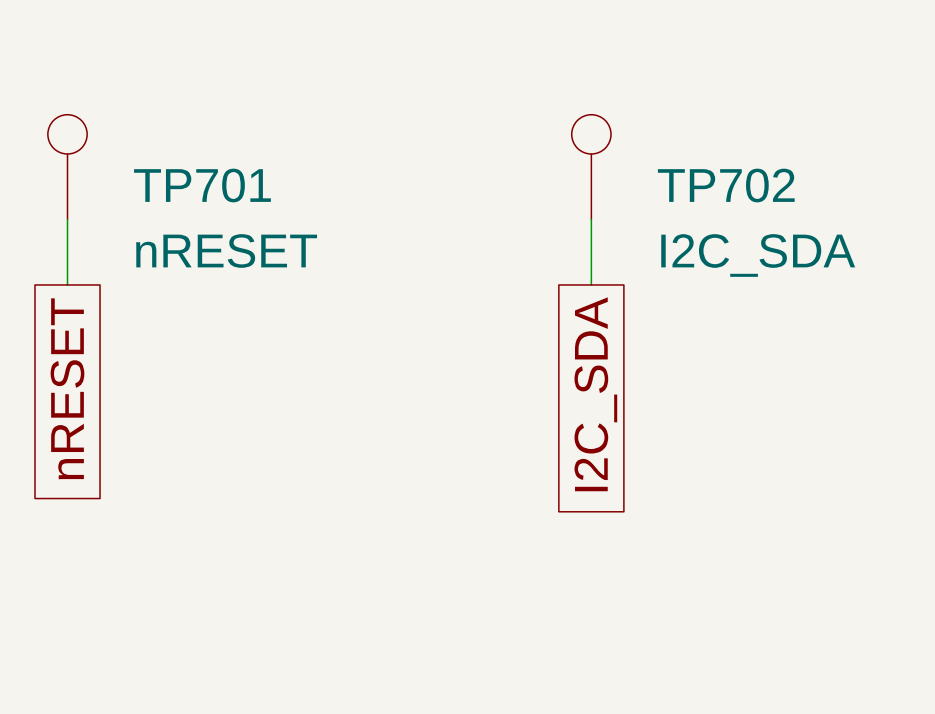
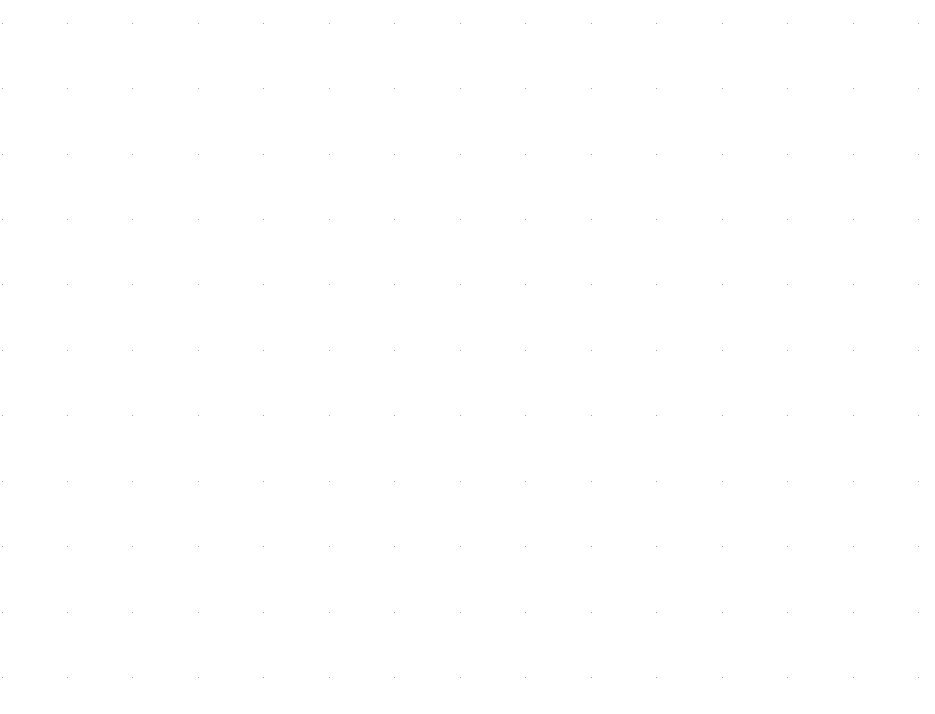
TP701: nRESET (67, 167) -> none
TP702: I2C_SDA (591, 167) -> none
wire: (67, 219) (67, 284) -> none
wire: (591, 219) (591, 284) -> none
global label: nRESET (67, 388) -> none
global label: I2C_SDA (595, 394) -> none

